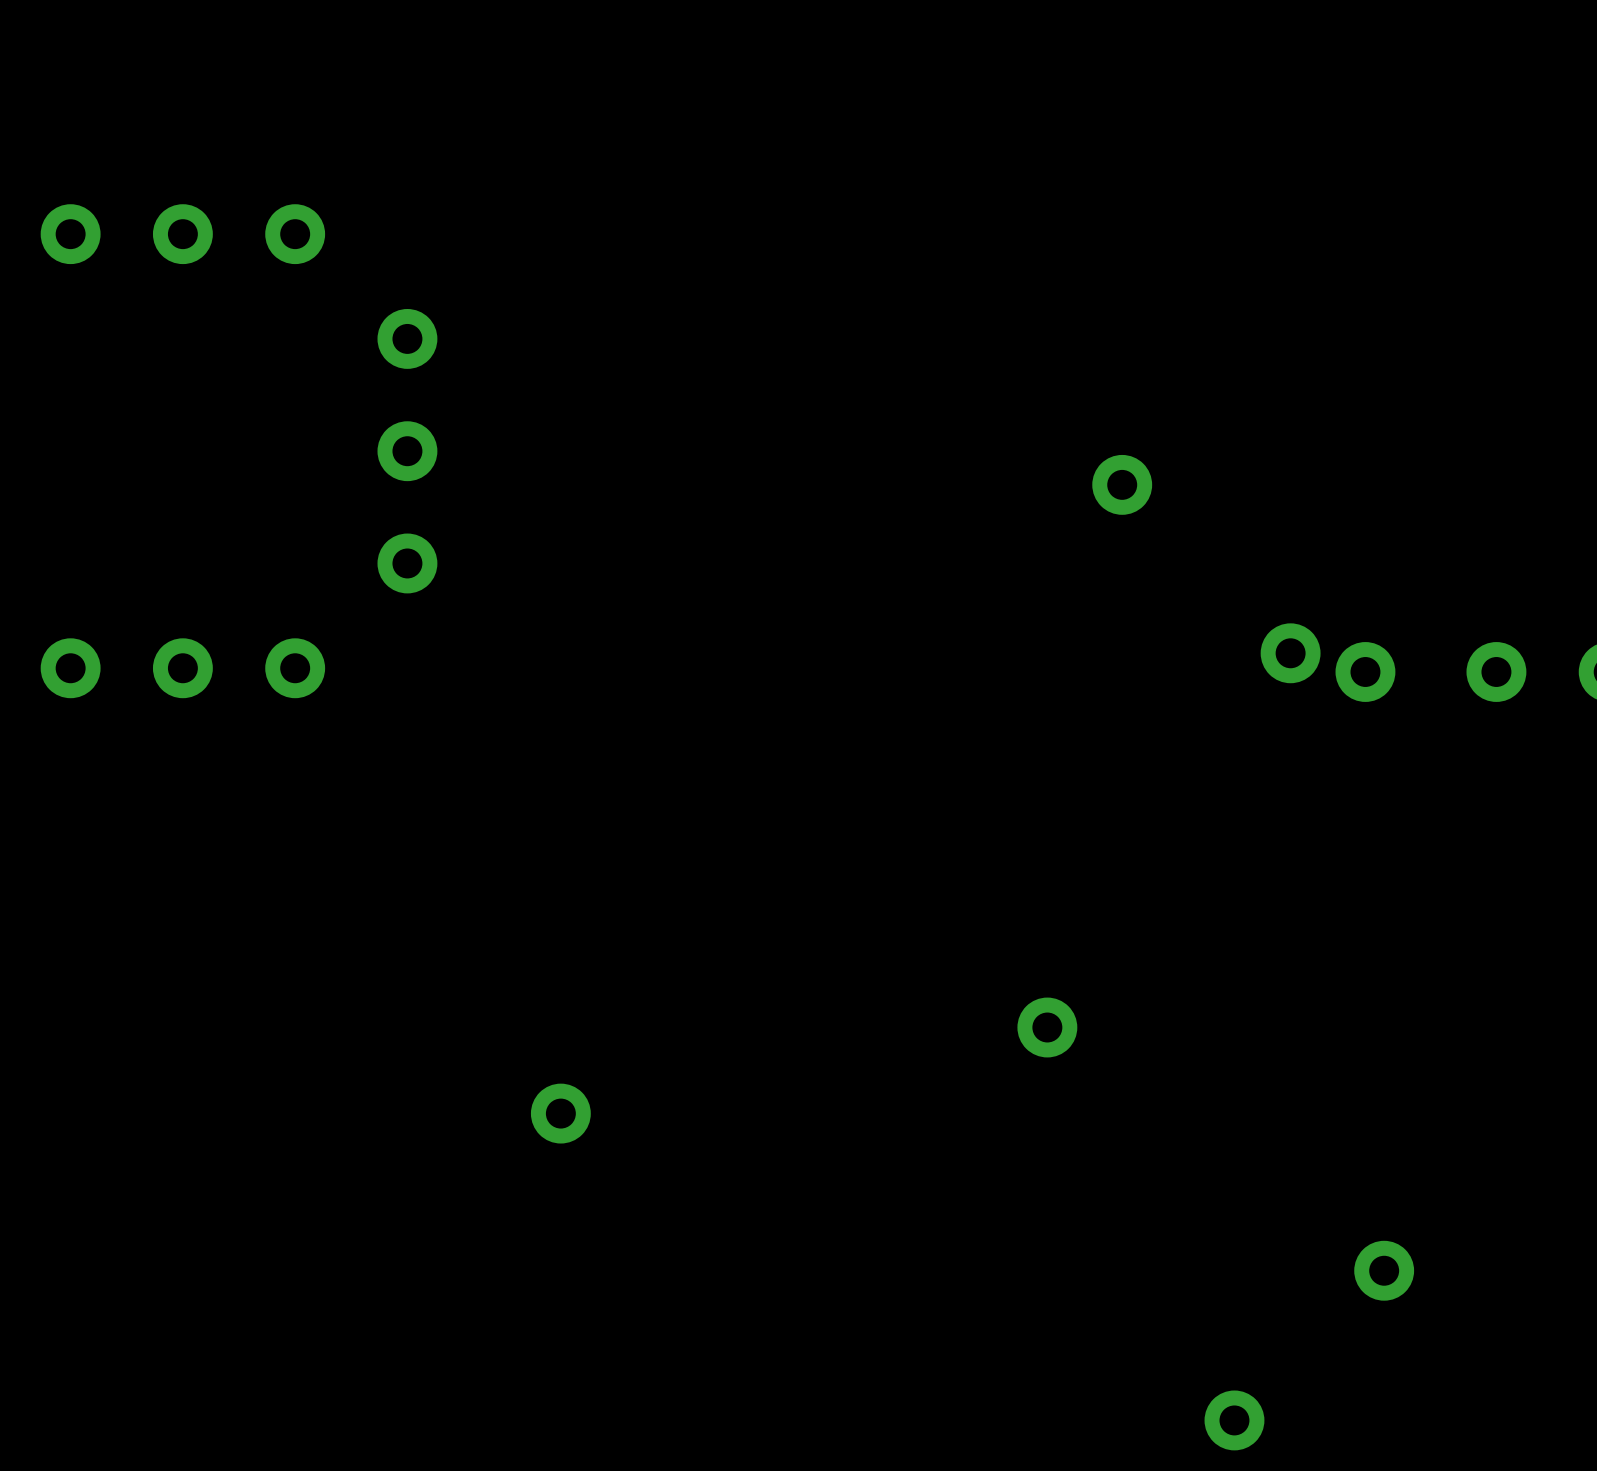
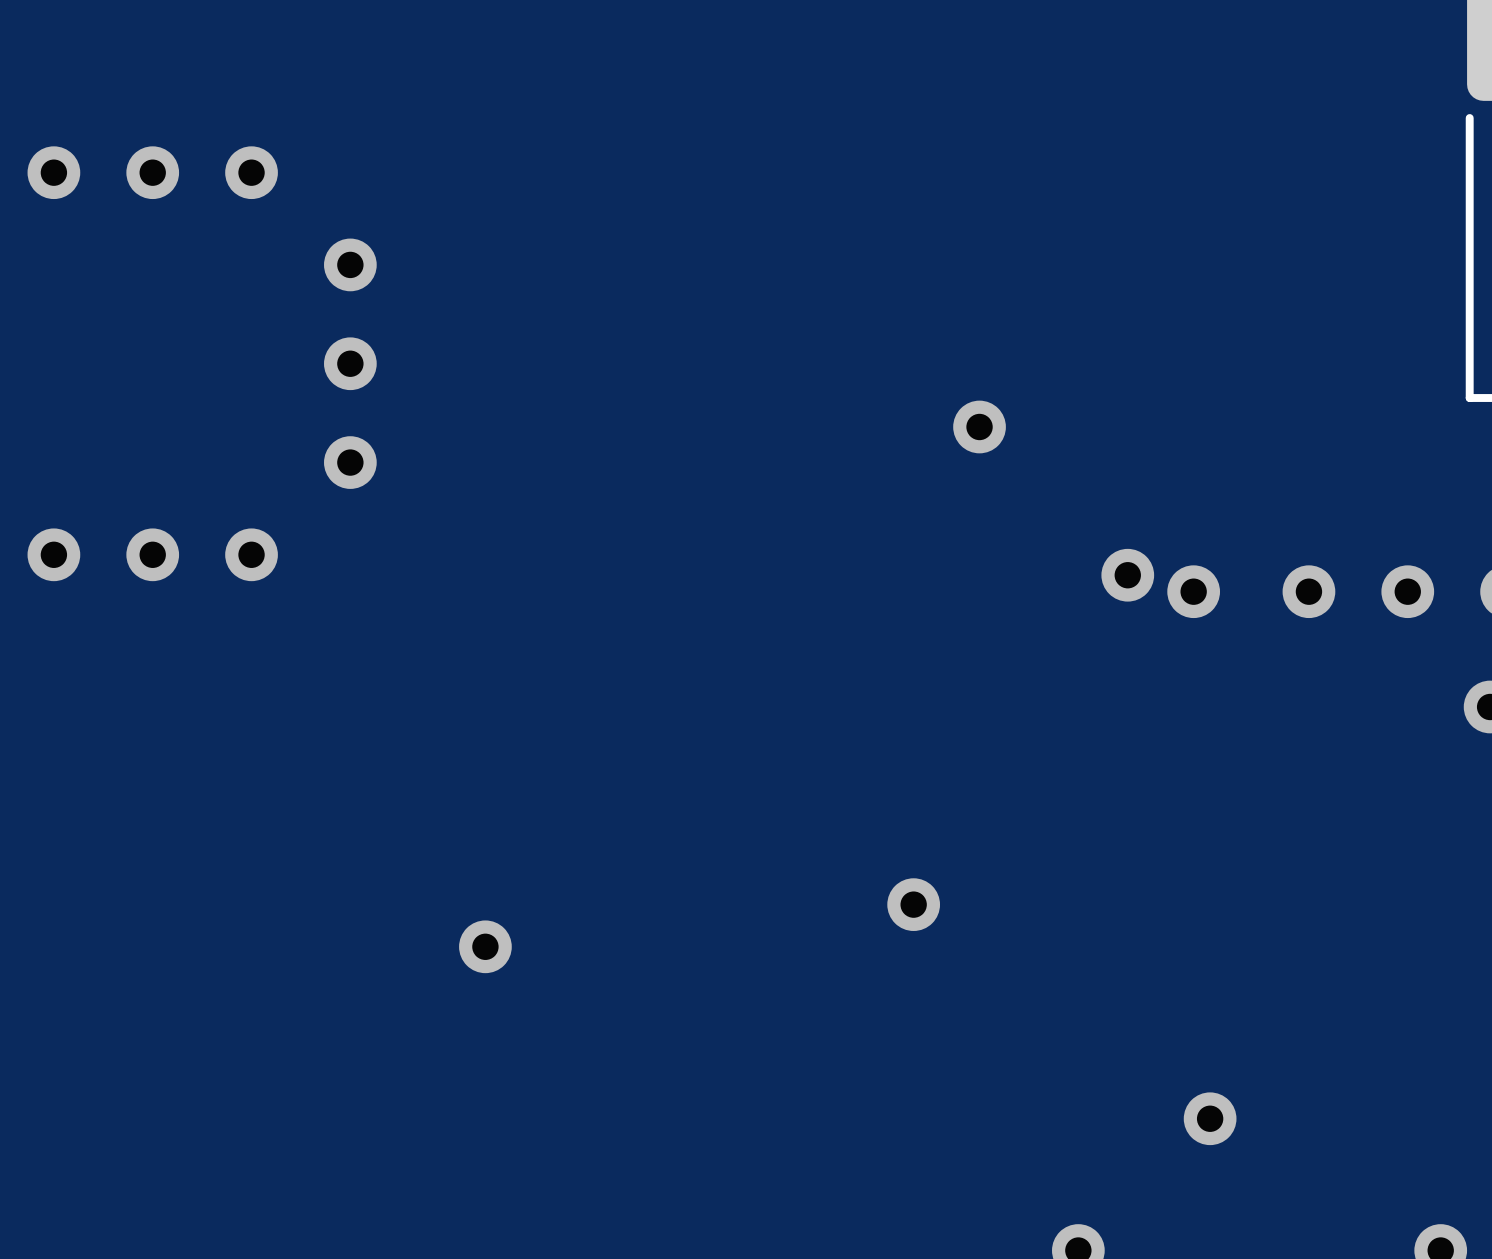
via position: (70, 234) -> (53, 172)
via position: (182, 234) -> (152, 172)
via position: (295, 234) -> (251, 172)
via position: (407, 338) -> (350, 264)
via position: (407, 451) -> (350, 363)
via position: (407, 563) -> (350, 462)
via position: (70, 668) -> (53, 554)
via position: (182, 668) -> (152, 554)
via position: (295, 668) -> (251, 554)
via position: (560, 1113) -> (485, 946)

